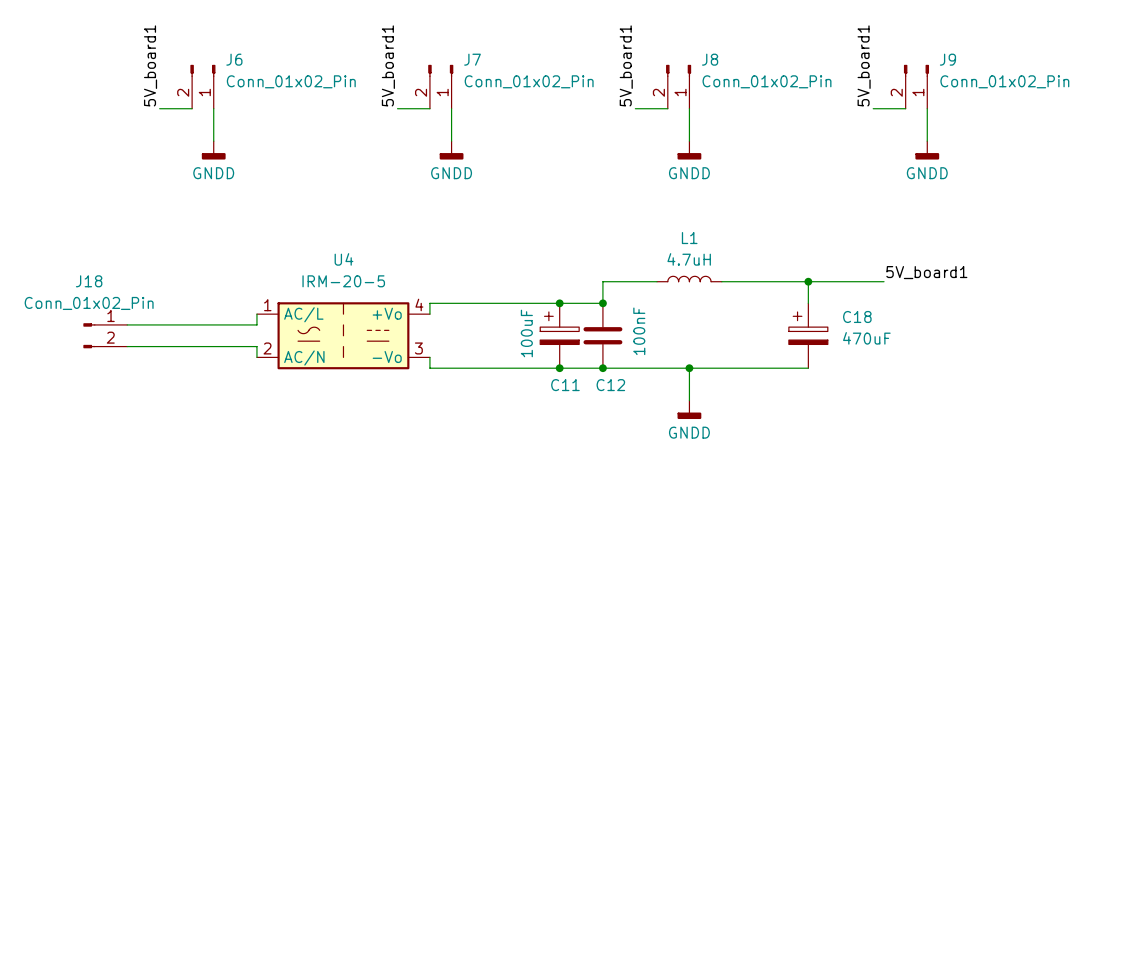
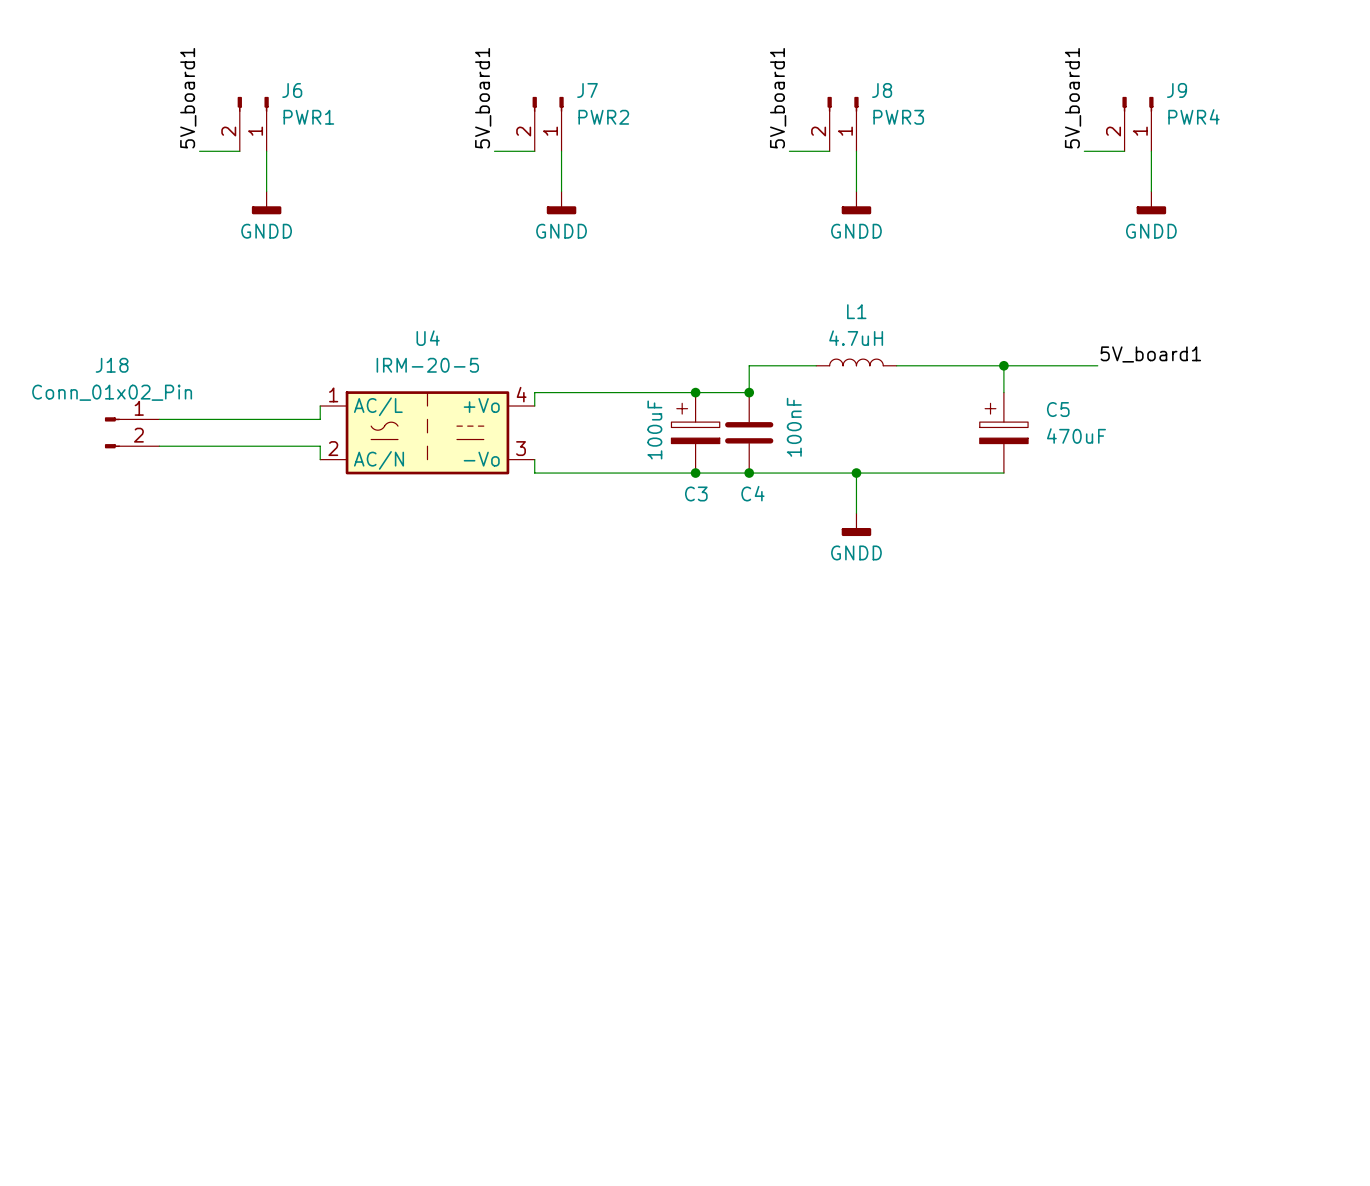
J6 value: Conn_01x02_Pin (291, 81) -> PWR1 (308, 117)
J7 value: Conn_01x02_Pin (529, 81) -> PWR2 (603, 117)
J8 value: Conn_01x02_Pin (766, 81) -> PWR3 (898, 117)
J9 value: Conn_01x02_Pin (1004, 81) -> PWR4 (1193, 116)
C18 name: C18 (857, 316) -> C5 (1058, 409)
C11 name: C11 (565, 385) -> C3 (696, 493)
C12 name: C12 (610, 385) -> C4 (752, 493)

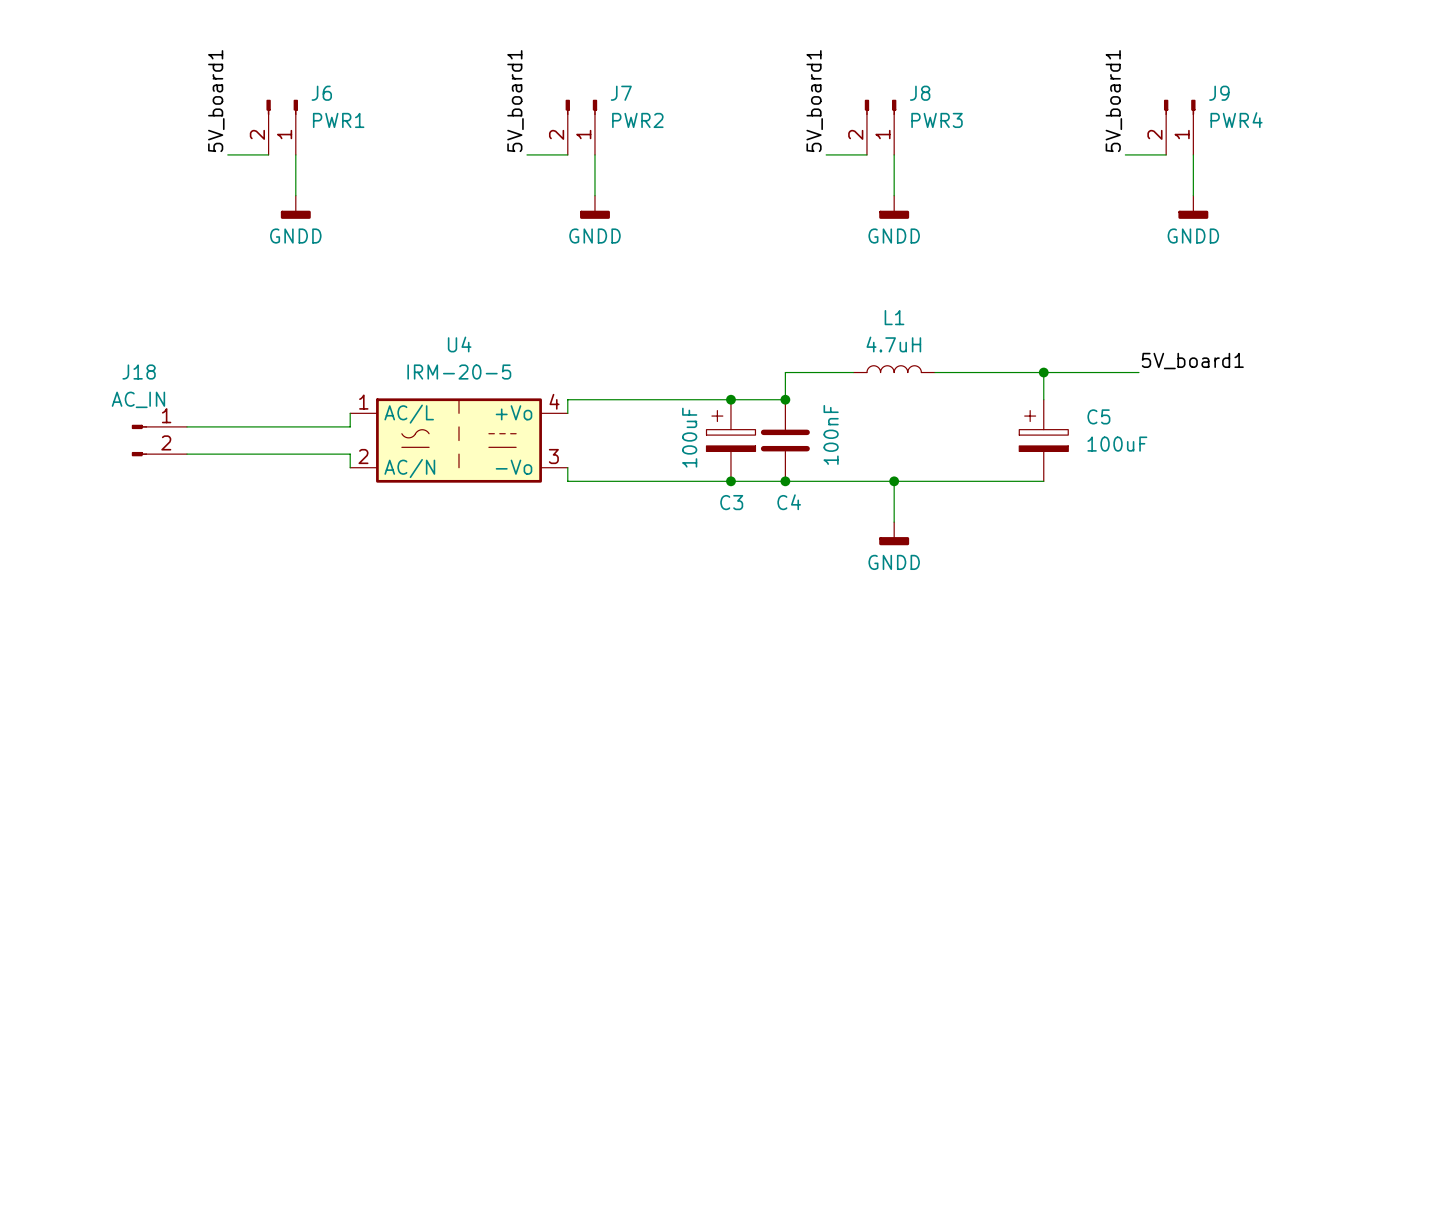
J18 value: Conn_01x02_Pin (112, 392) -> AC_IN (138, 399)
C5 value: 470uF (1076, 436) -> 100uF (1117, 444)

